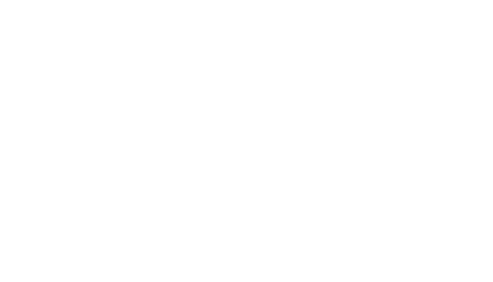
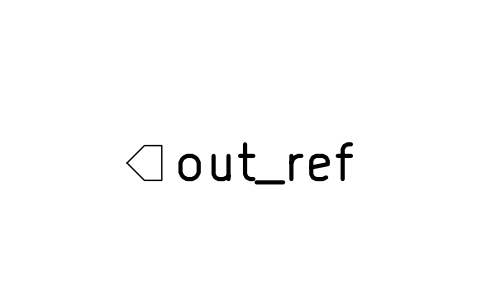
hierarchical label: none -> out_ref (265, 163)

